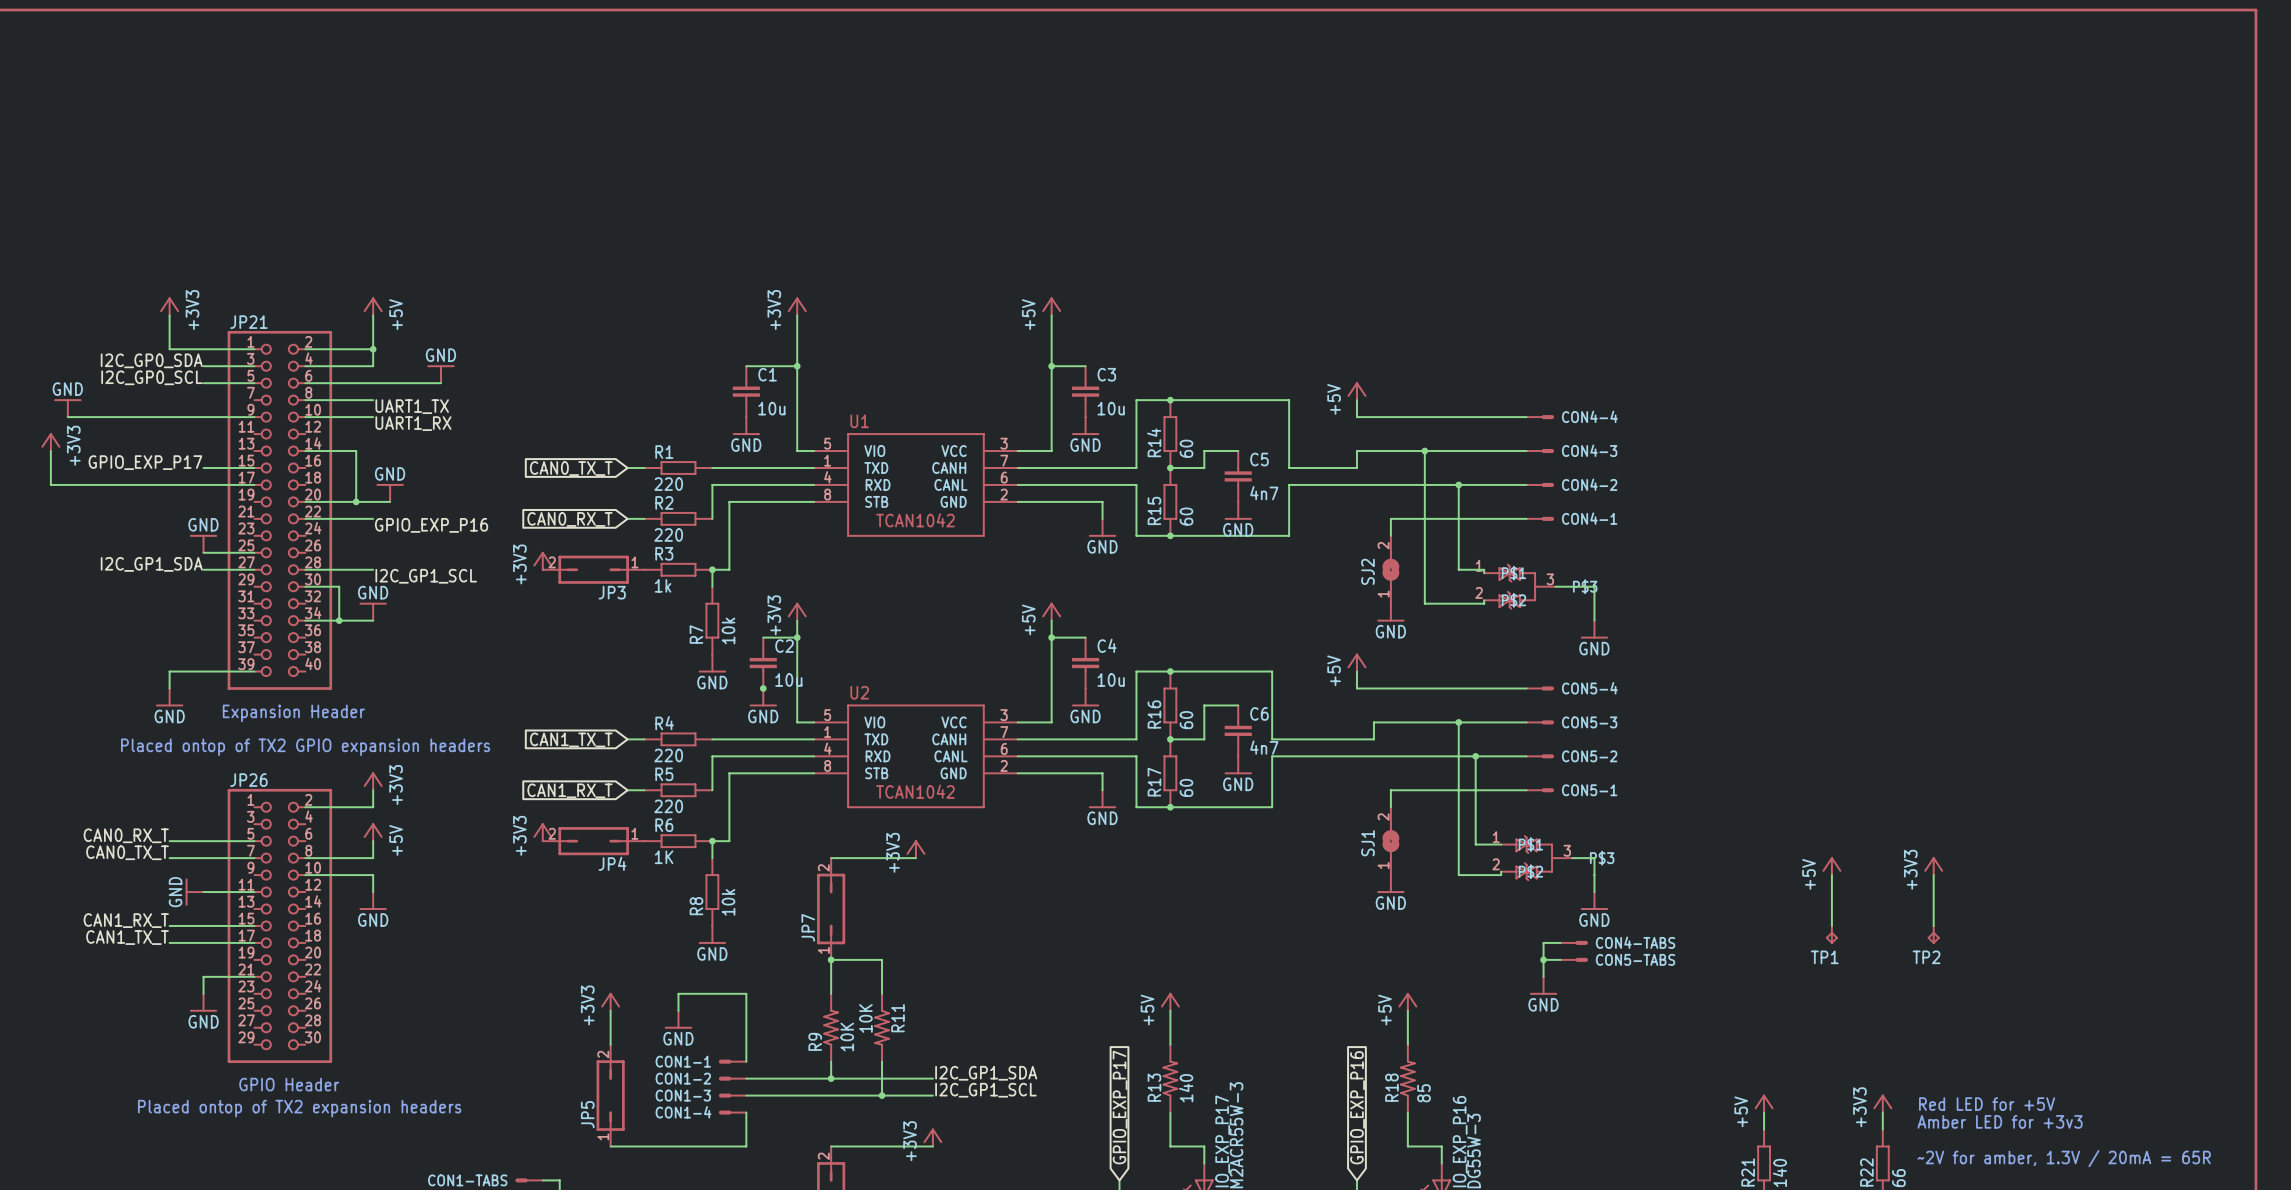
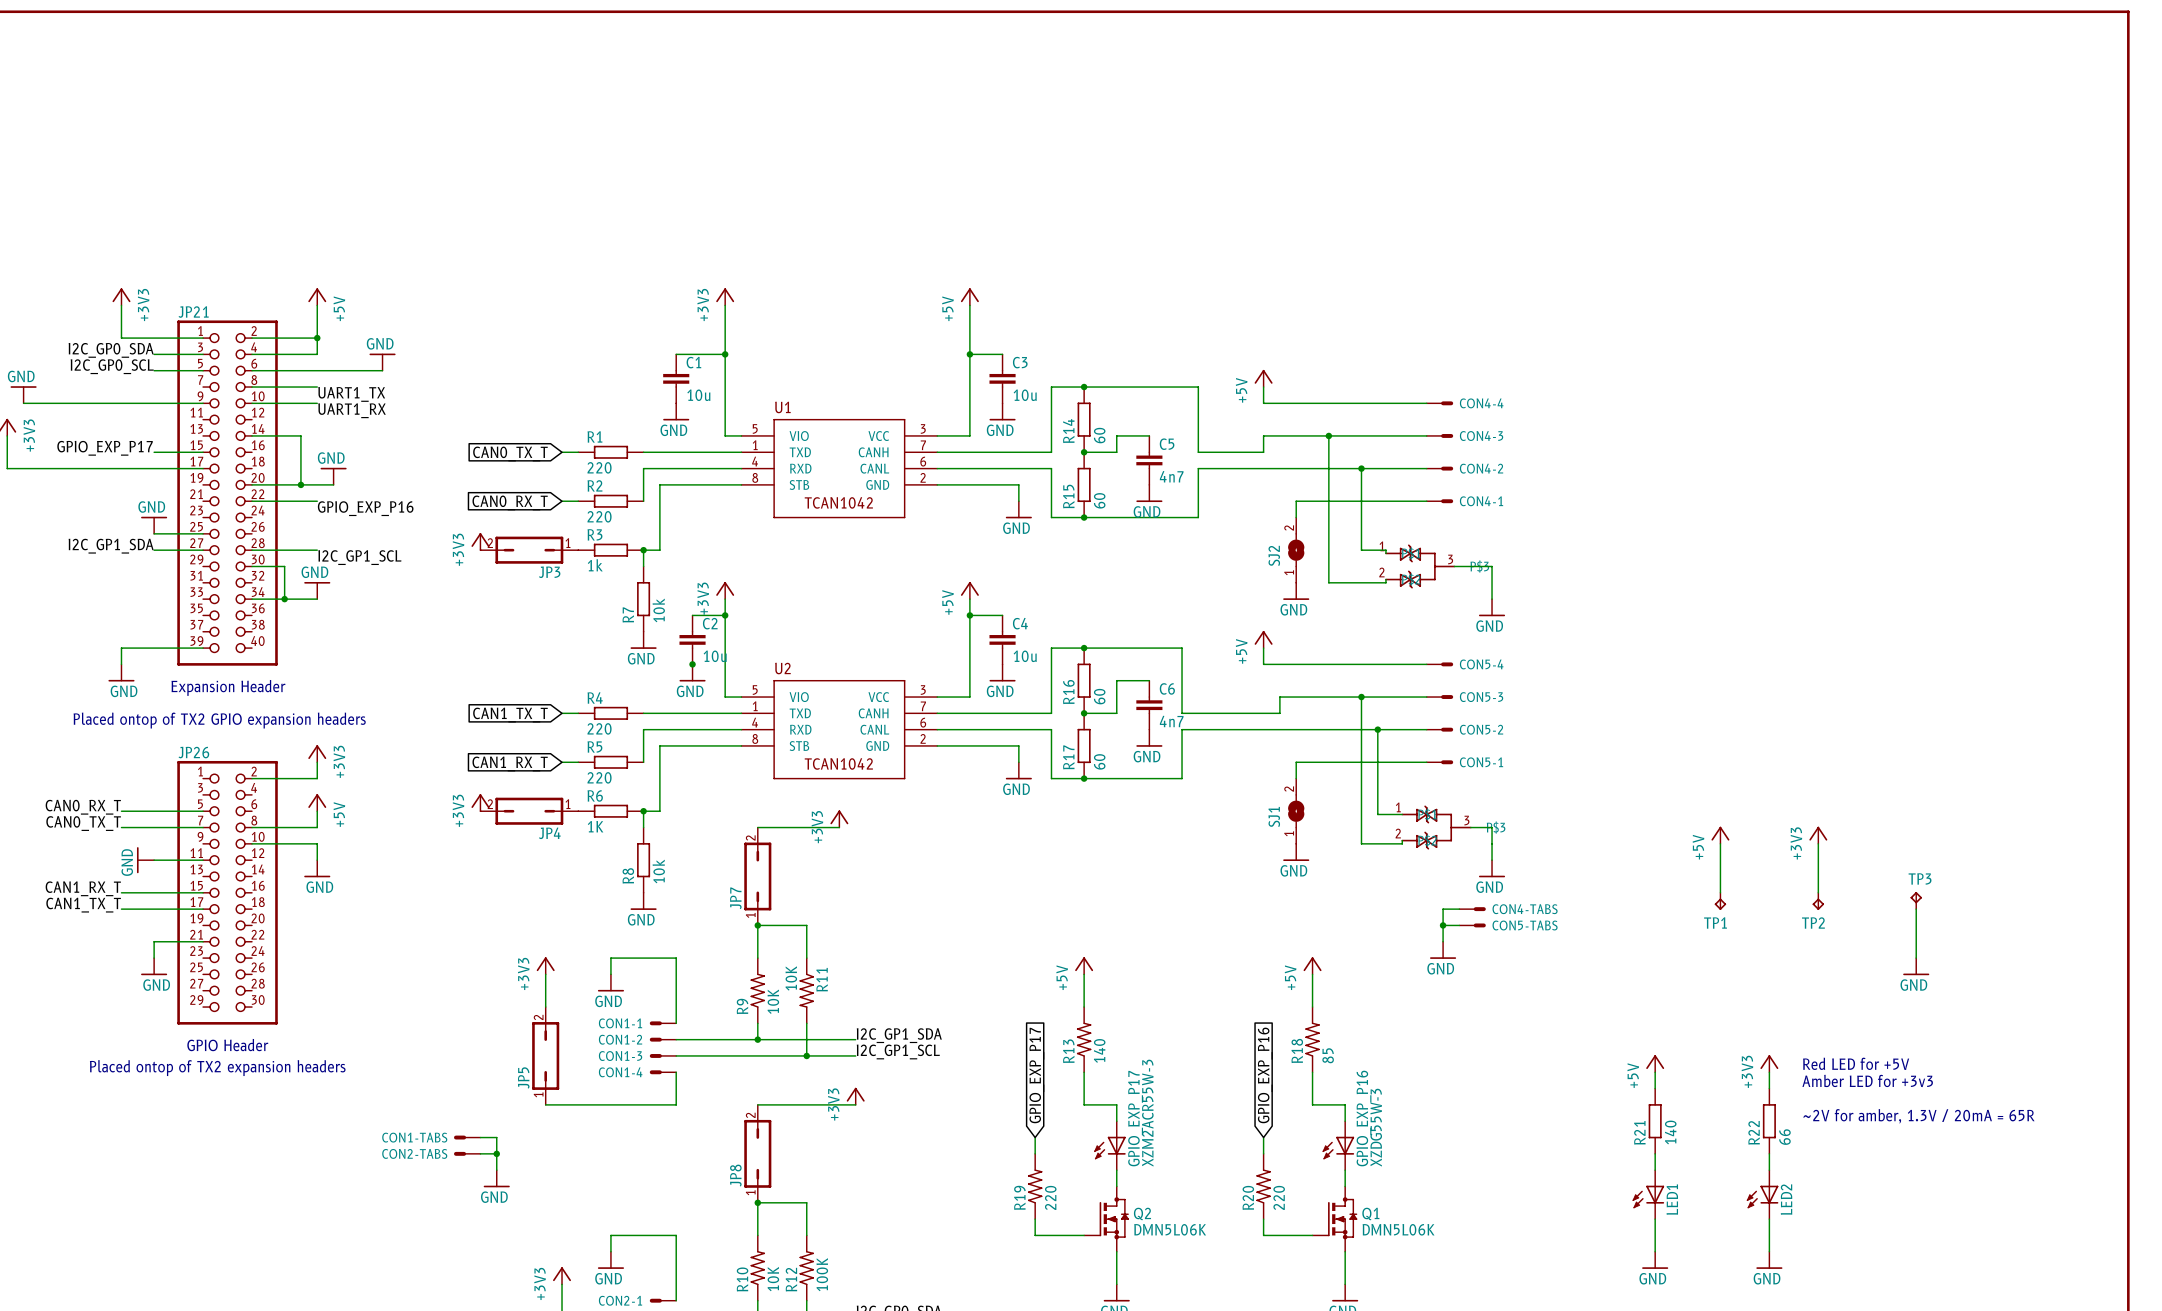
TP3: none -> (1916, 900)
wire: none -> (1916, 909) (1916, 958)
power symbol: none -> GND (1916, 966)

